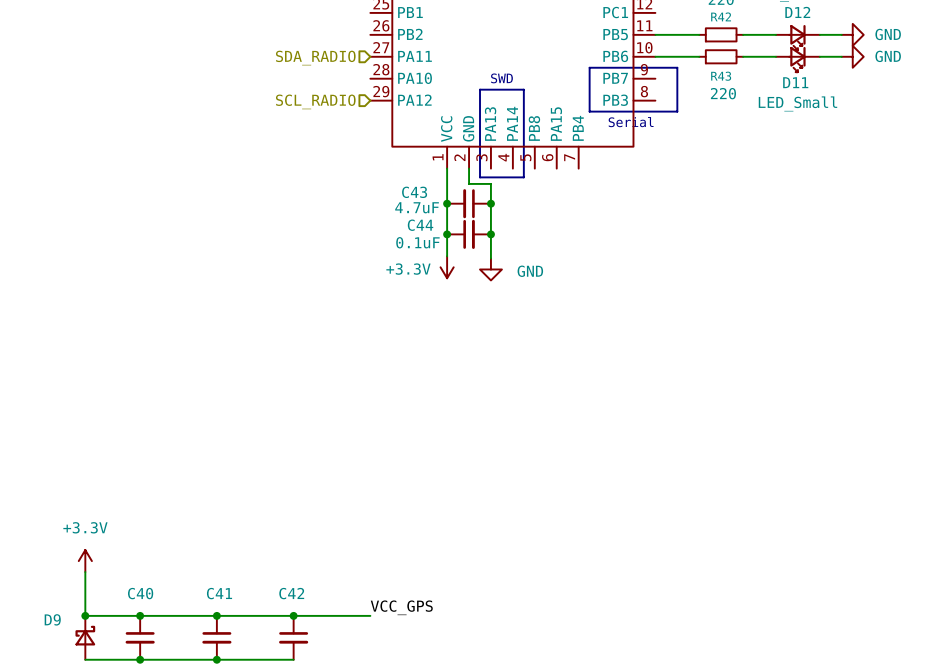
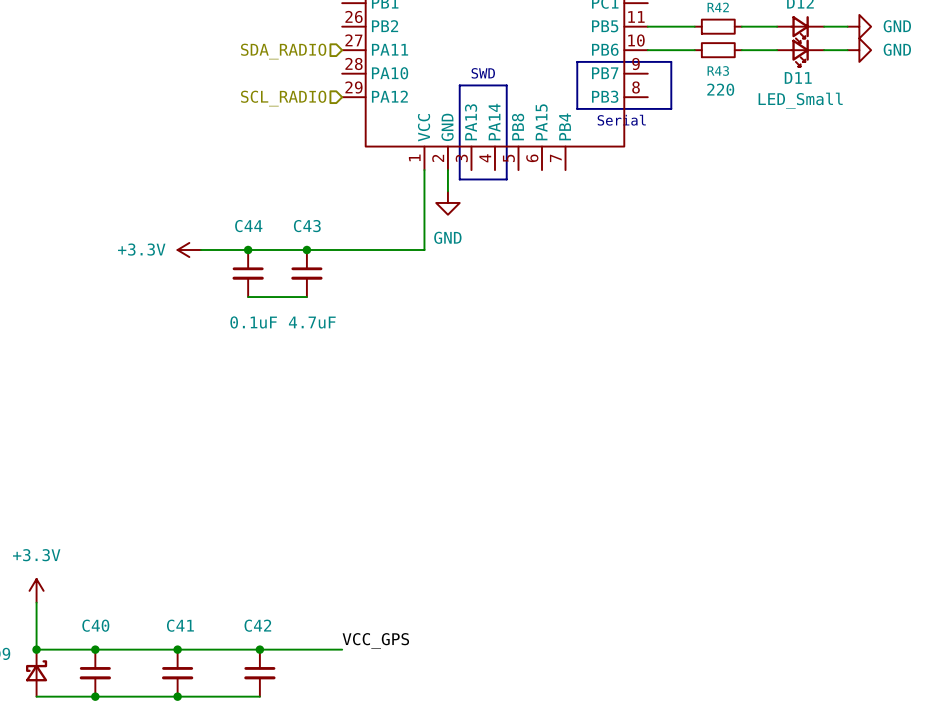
wire: (469, 183) (490, 183) (490, 258) -> (447, 186) (447, 191)
C43 name position: C43 (414, 192) -> C43 (307, 226)
junction: (447, 203) -> none
C43 rotation: 0° (468, 203) -> 90° counterclockwise (306, 273)
C43 position: (469, 203) -> (306, 273)
junction: (490, 203) -> none
junction: (447, 234) -> none
C44 rotation: 0° (469, 234) -> 90° clockwise (248, 273)
C44 position: (469, 234) -> (248, 273)
junction: (490, 234) -> none
C44 value position: 0.1uF (417, 242) -> 0.1uF (253, 322)
power symbol: none -> +3.3V (189, 250)
junction: none -> (248, 250)
junction: none -> (306, 250)
wire: (447, 243) (447, 256) -> (424, 250) (201, 250)
power symbol: +3.3V (447, 267) -> none
power symbol position: GND (490, 269) -> GND (447, 202)
power symbol text position: GND (530, 271) -> GND (447, 237)
wire: none -> (248, 297) (306, 297)

